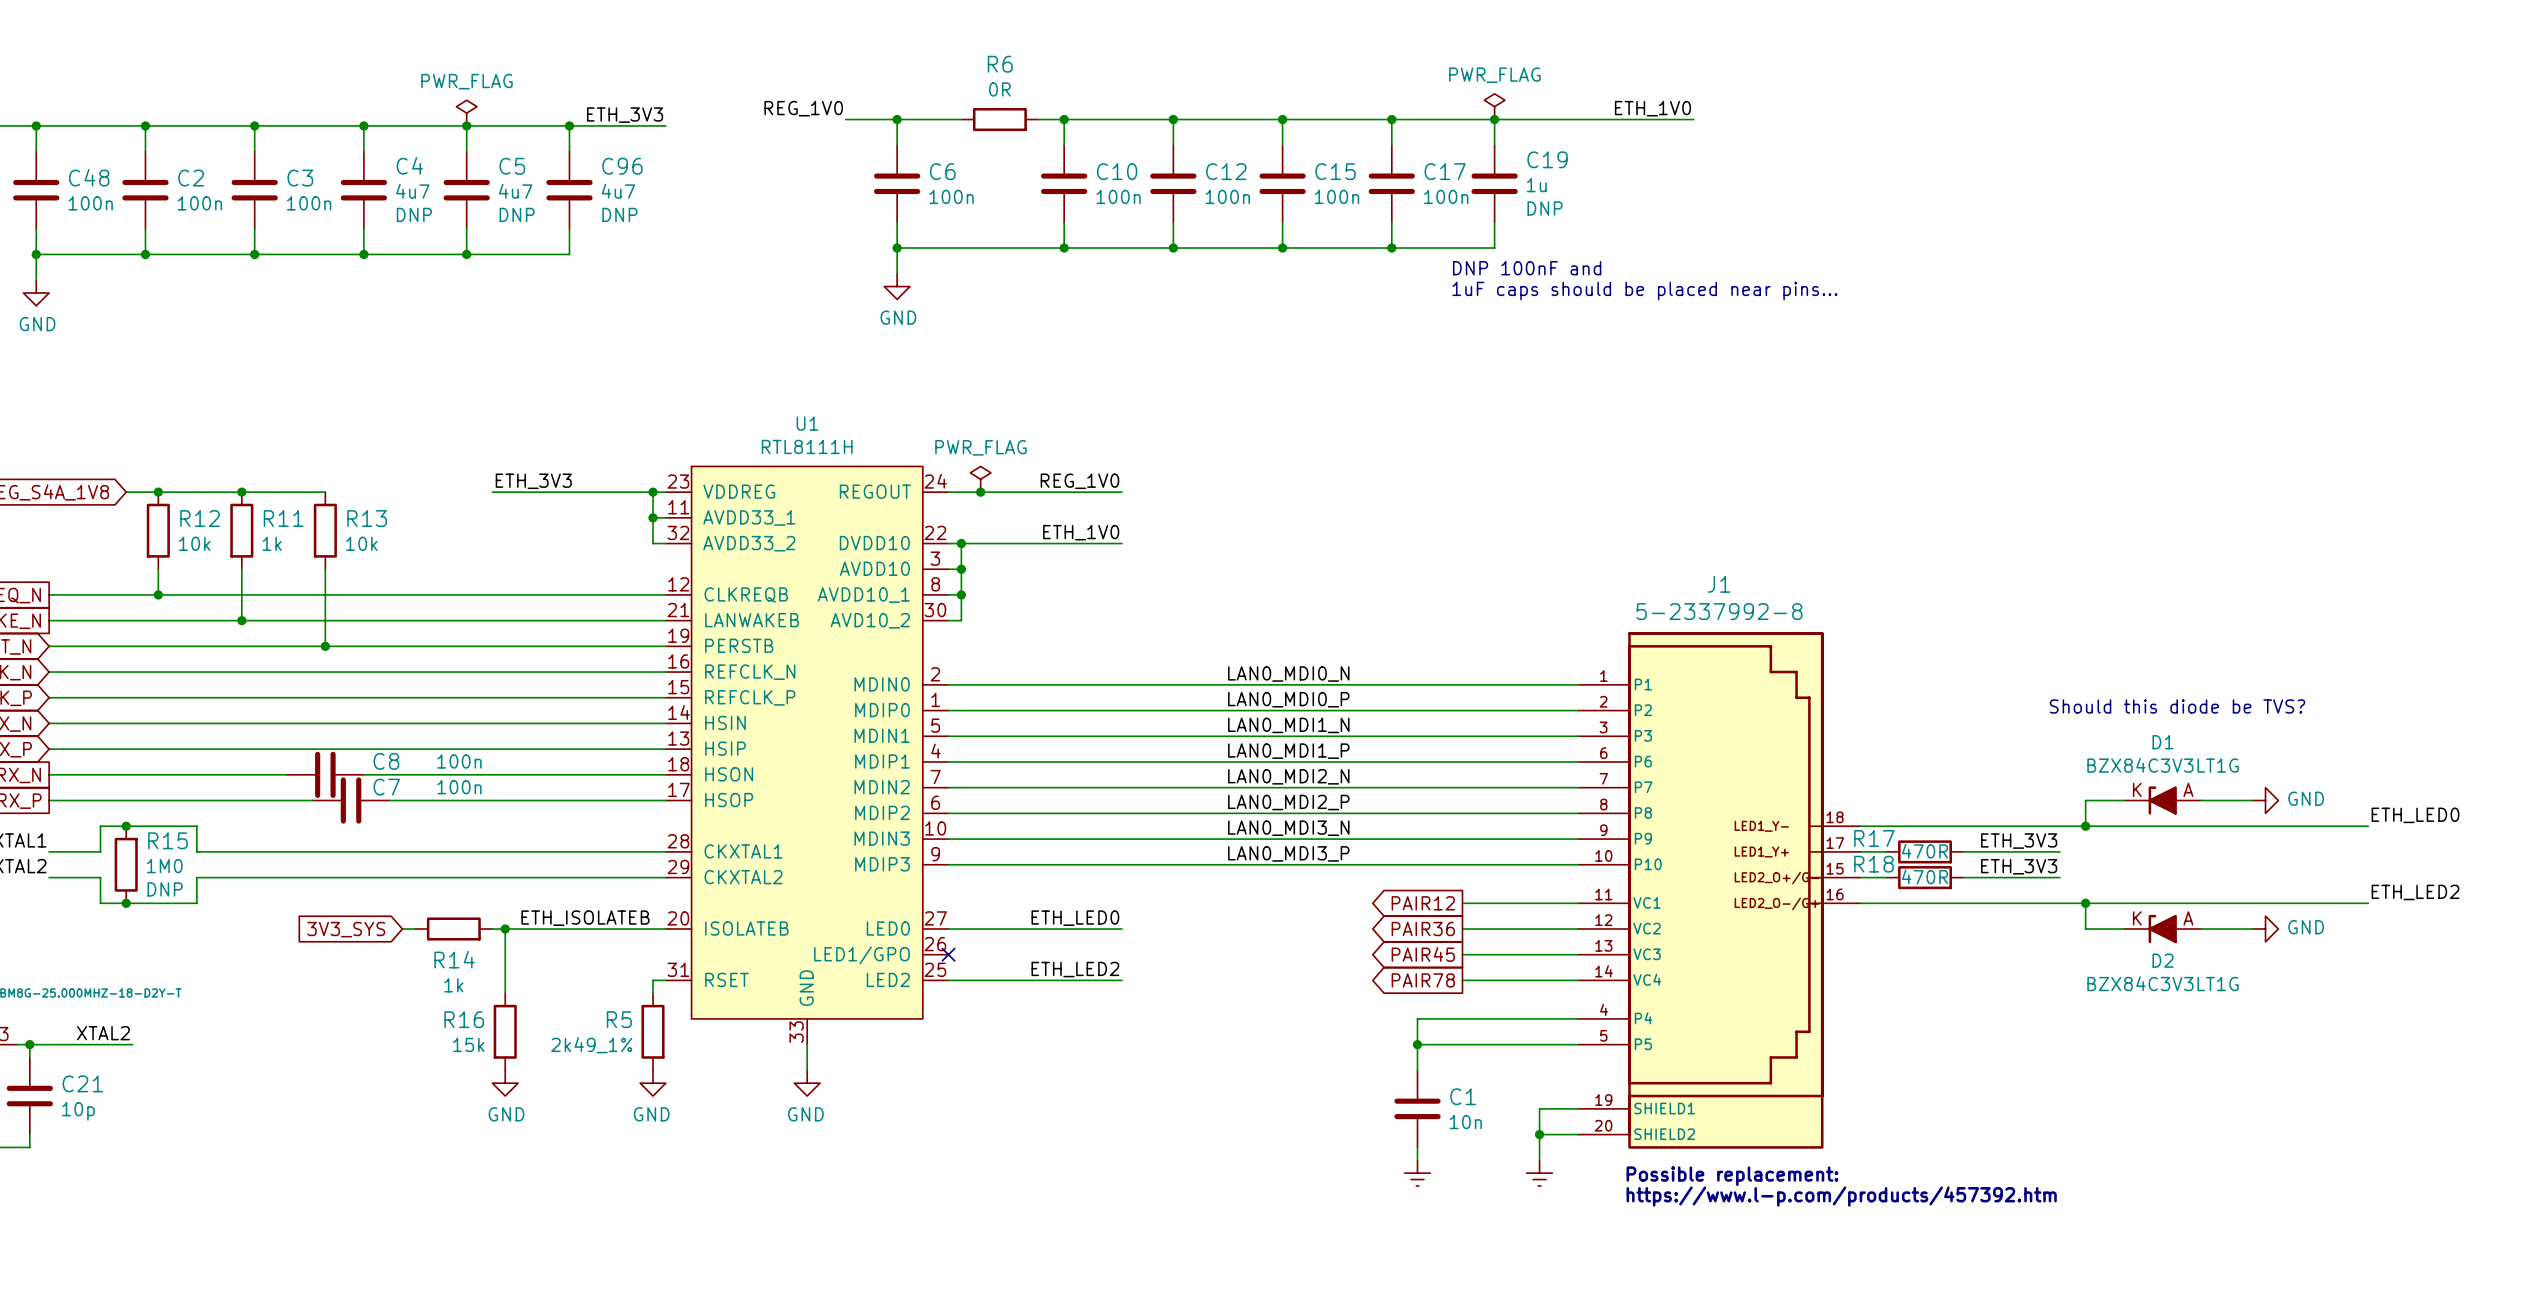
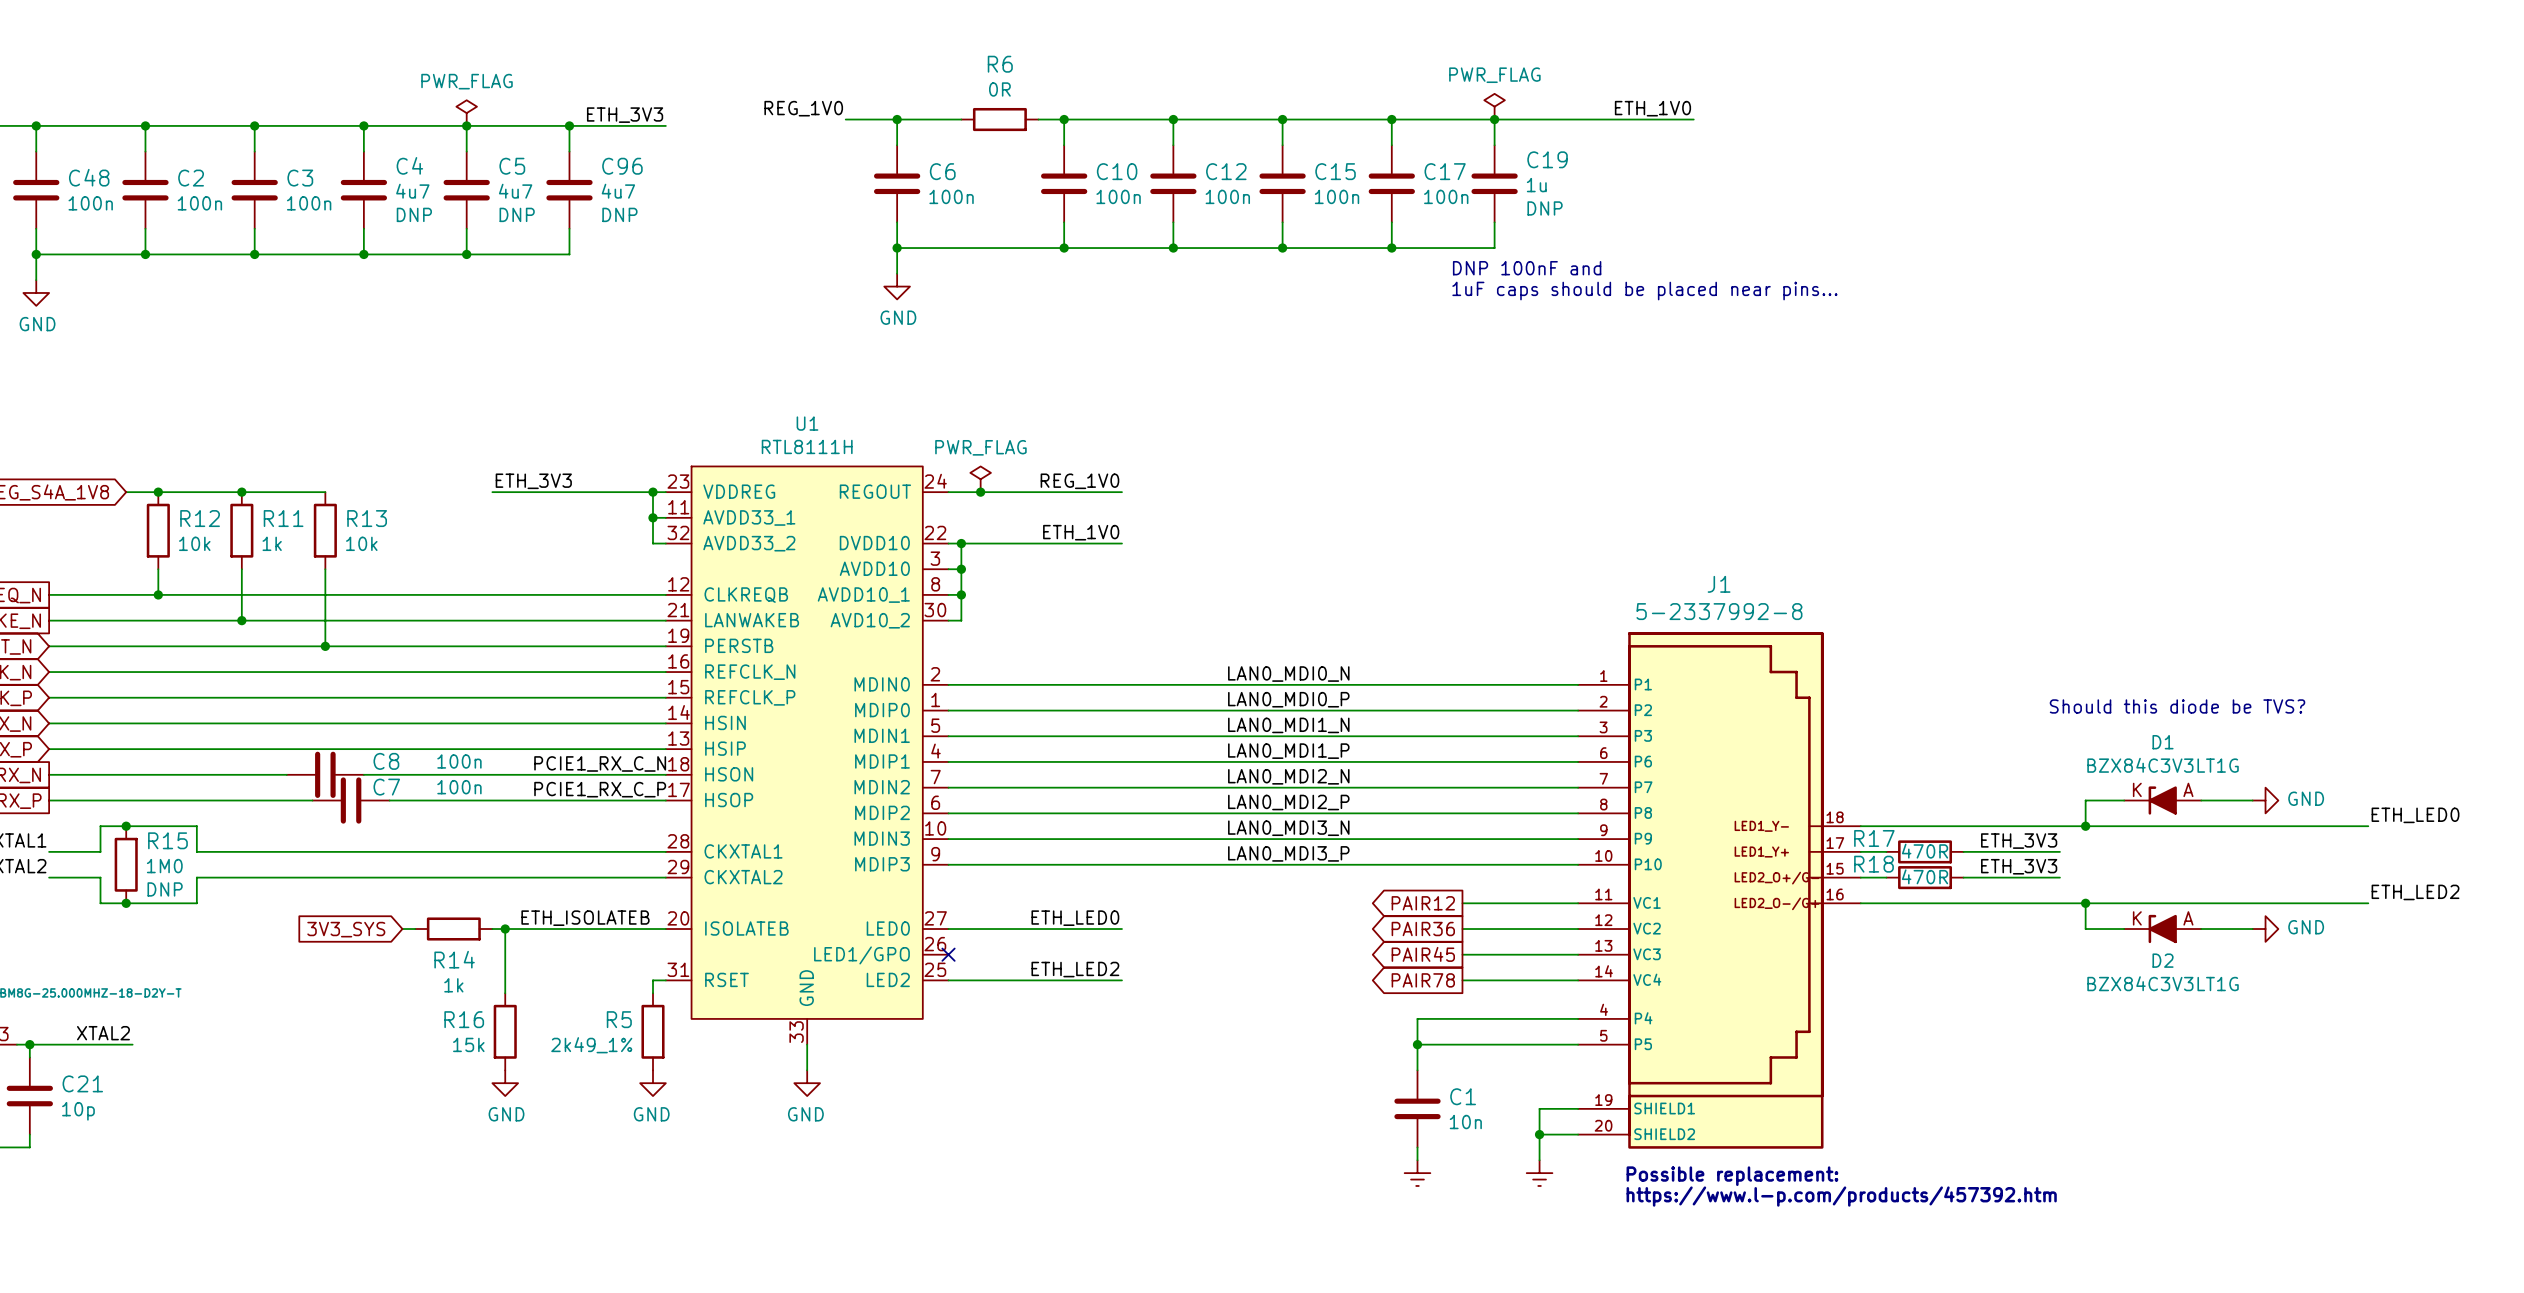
label: none -> PCIE1_RX_C_N (600, 763)
label: none -> PCIE1_RX_C_P (600, 789)

